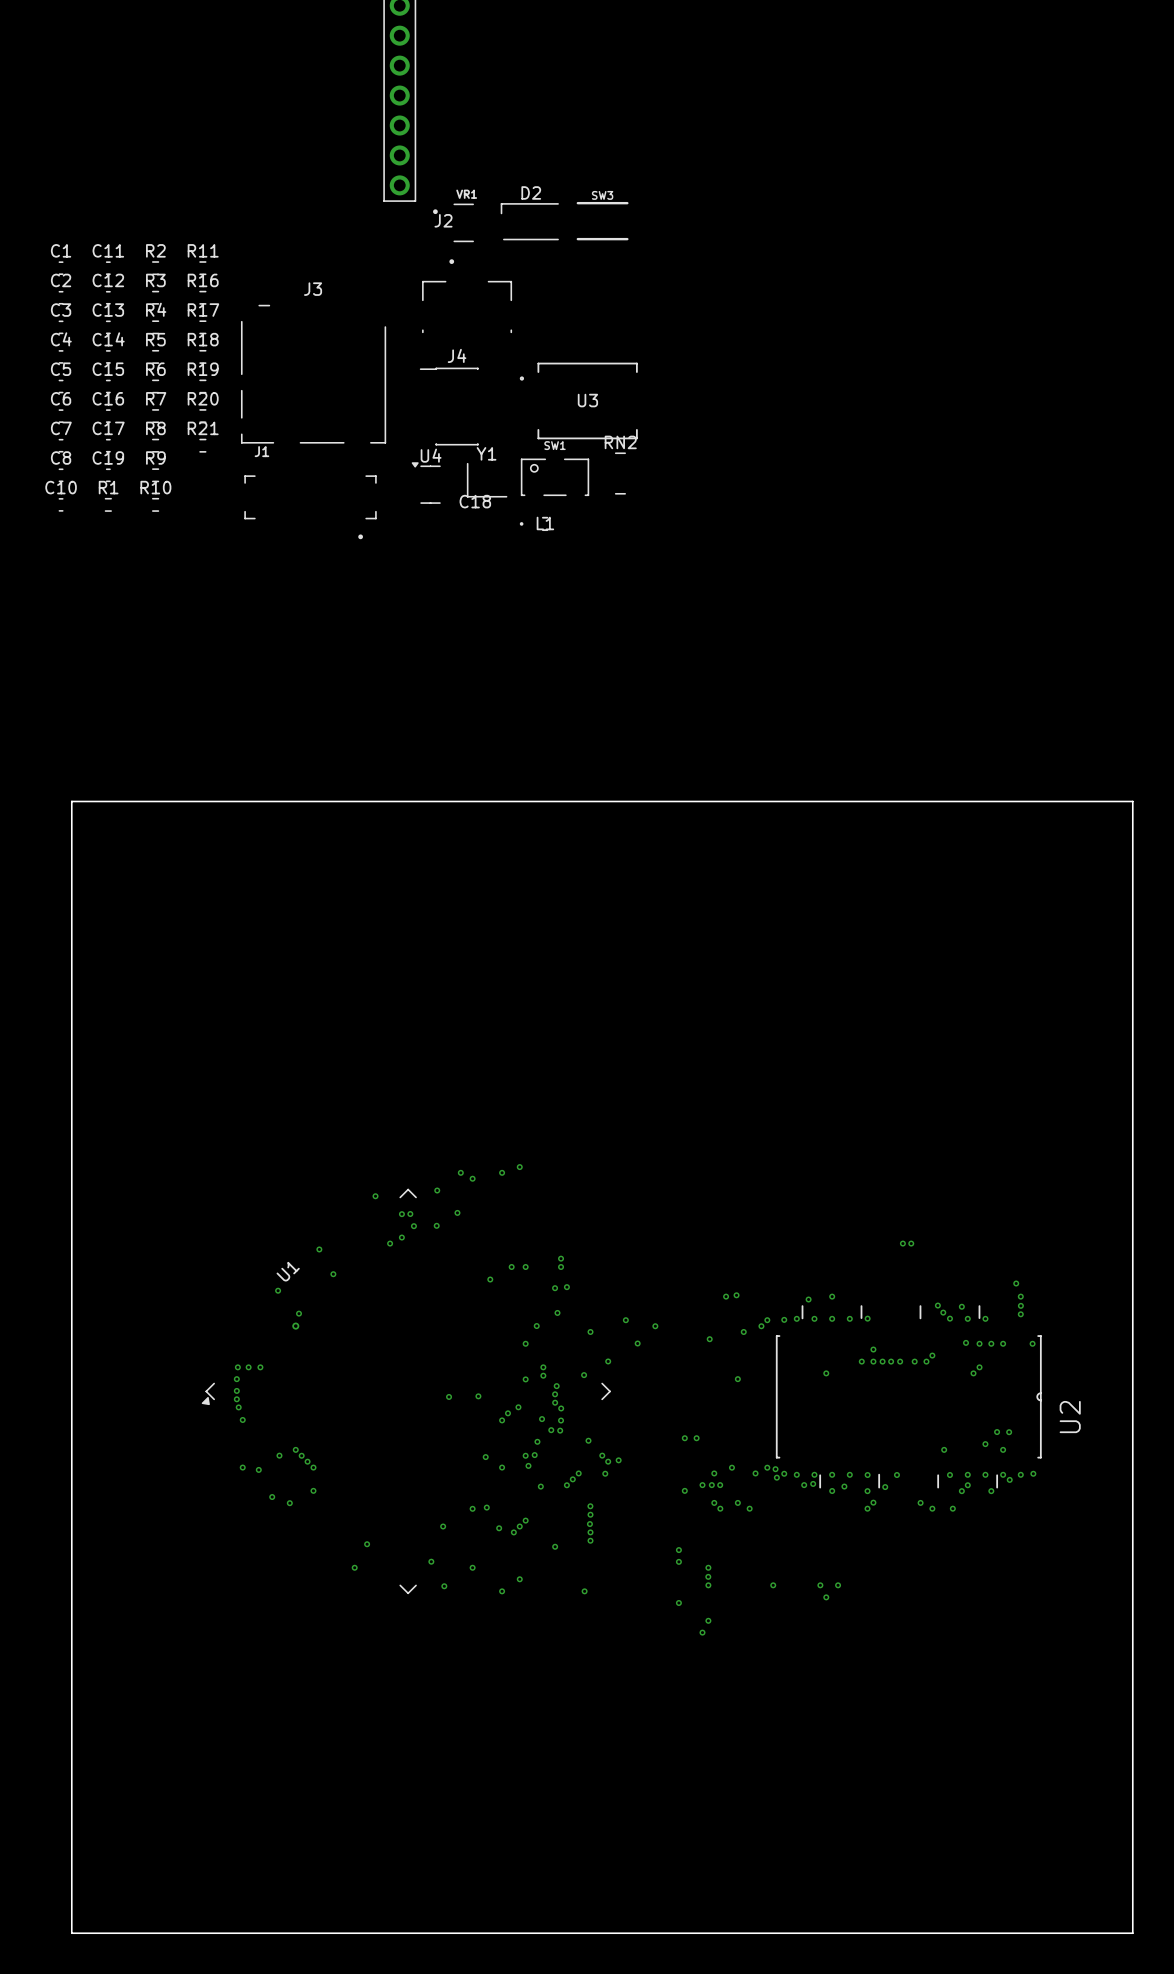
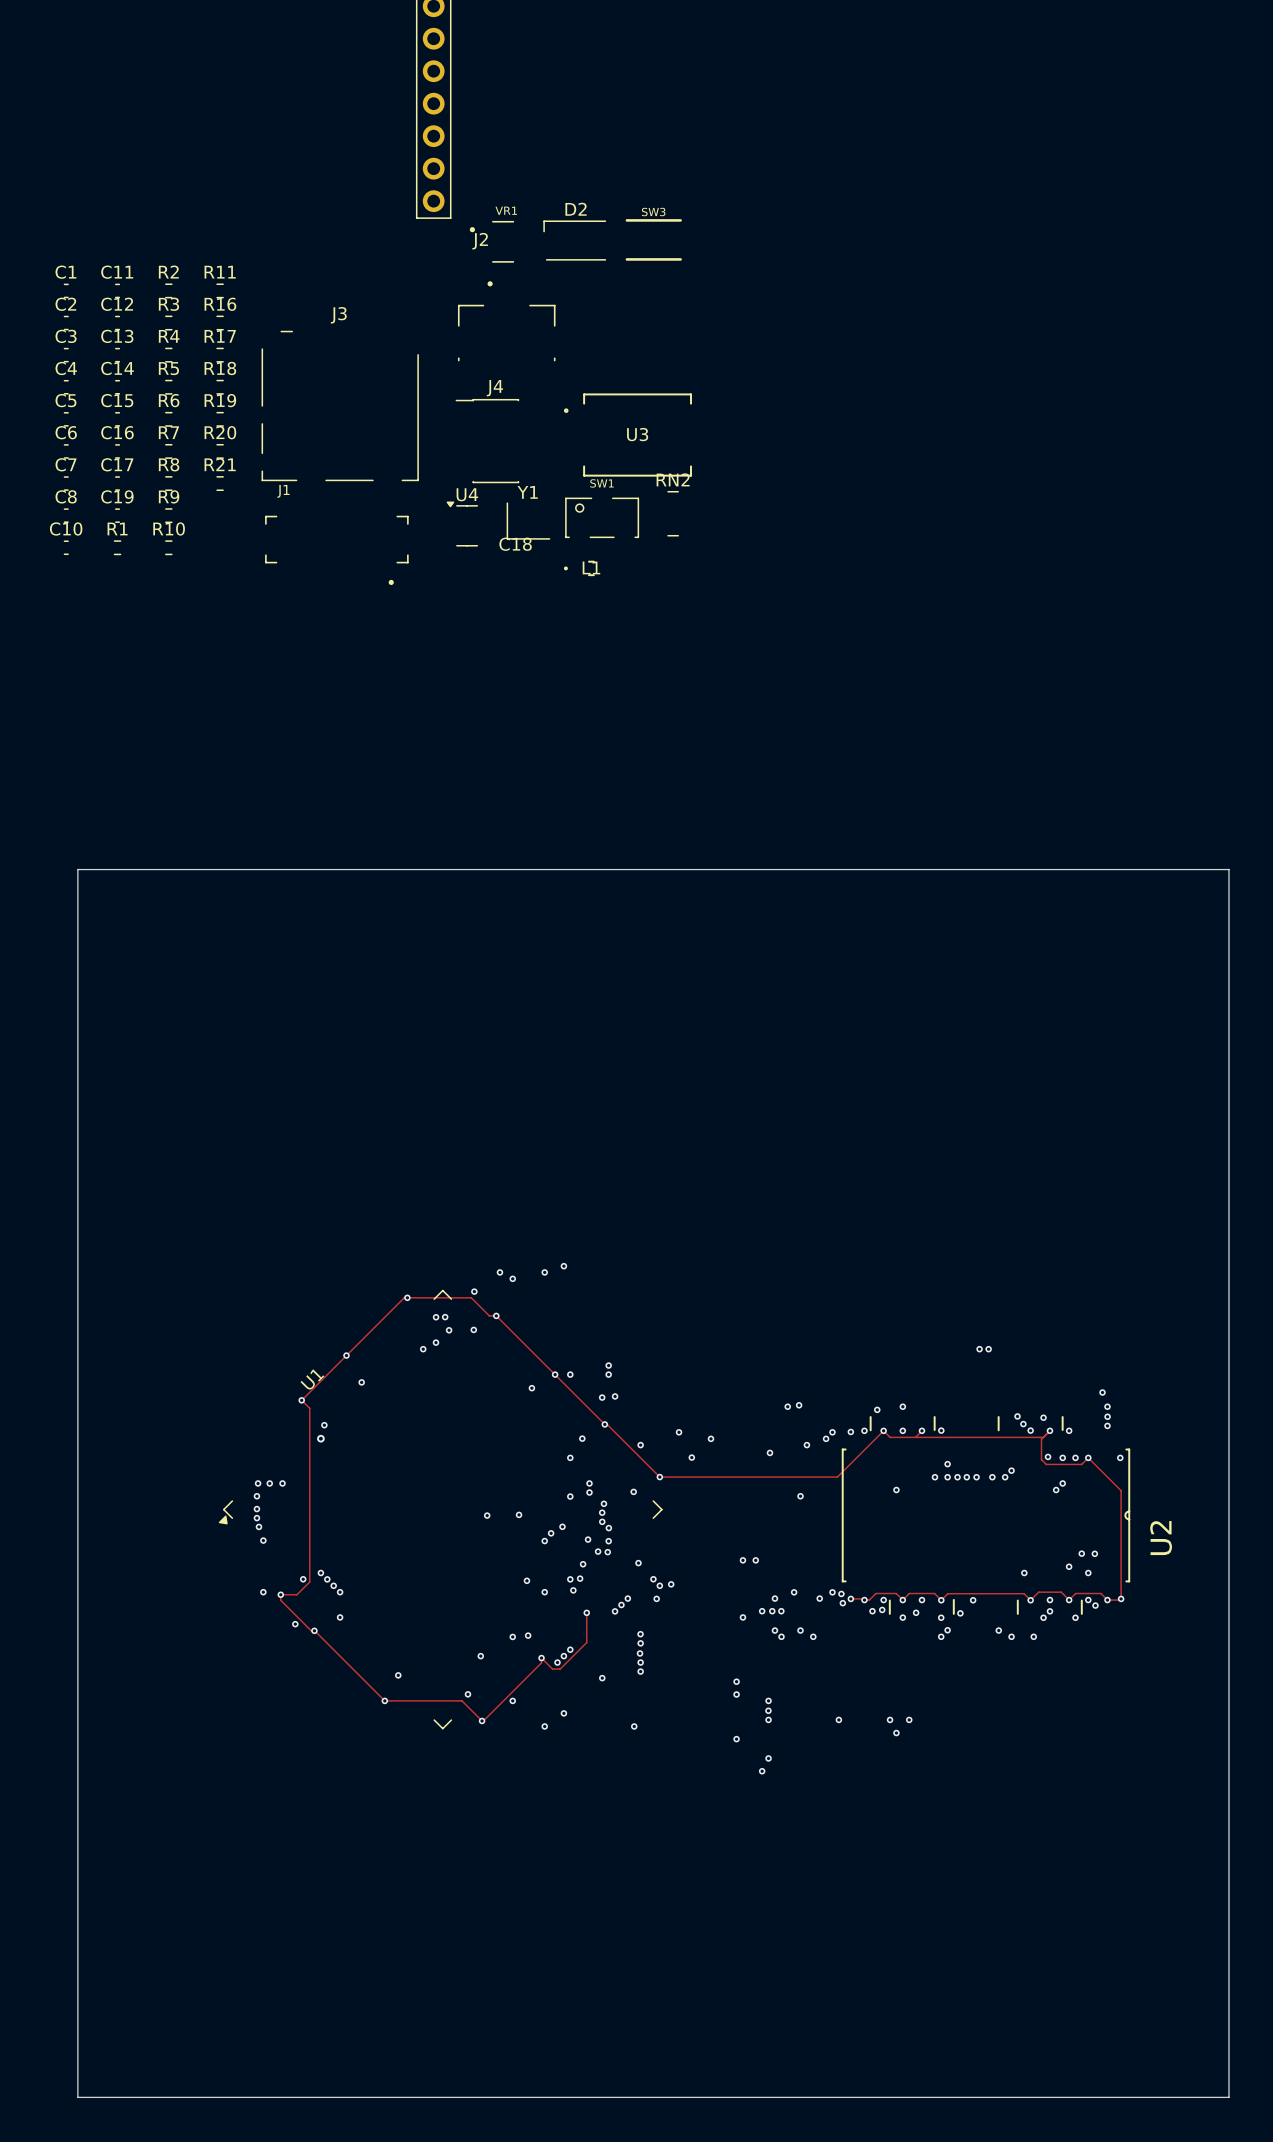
track: none -> (555, 1374) (496, 1315) (489, 1315) (471, 1297) (404, 1297) (301, 1400) (309, 1408) (309, 1581) (296, 1594) (280, 1594) (280, 1600) (311, 1630) (314, 1630) (384, 1700) (462, 1700) (482, 1720) (541, 1662) (541, 1658) (552, 1669) (560, 1669) (586, 1642) (586, 1612)
track: none -> (555, 1374) (659, 1477) (837, 1477) (883, 1430) (890, 1437) (1043, 1437)
track: none -> (1049, 1430) (1041, 1439) (1041, 1459) (1046, 1464) (1081, 1464) (1088, 1457) (1121, 1490) (1119, 1600) (1107, 1600) (1100, 1593) (1075, 1593) (1069, 1600) (1061, 1592) (1038, 1592) (1030, 1600) (1024, 1593) (947, 1593) (941, 1600) (934, 1593) (909, 1593) (902, 1600) (896, 1593) (875, 1593) (869, 1600) (850, 1598)
track: none -> (921, 1431) (915, 1437)

